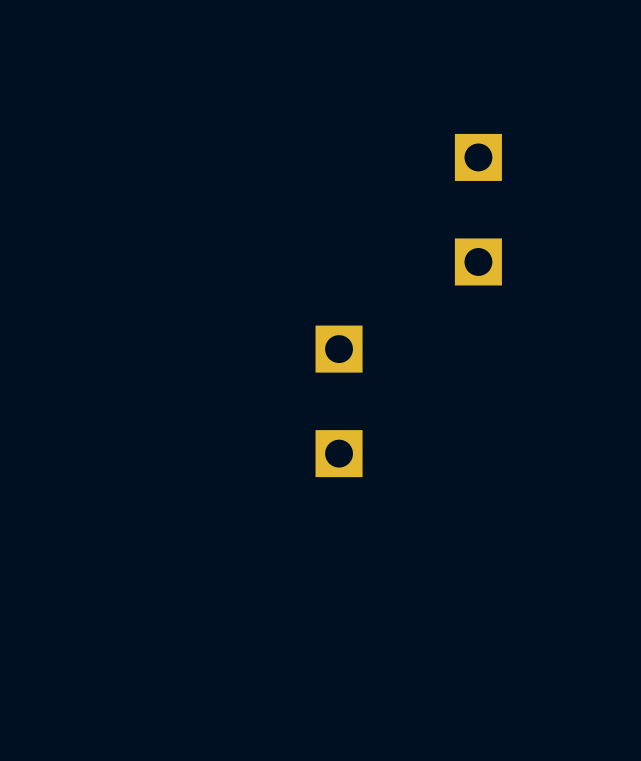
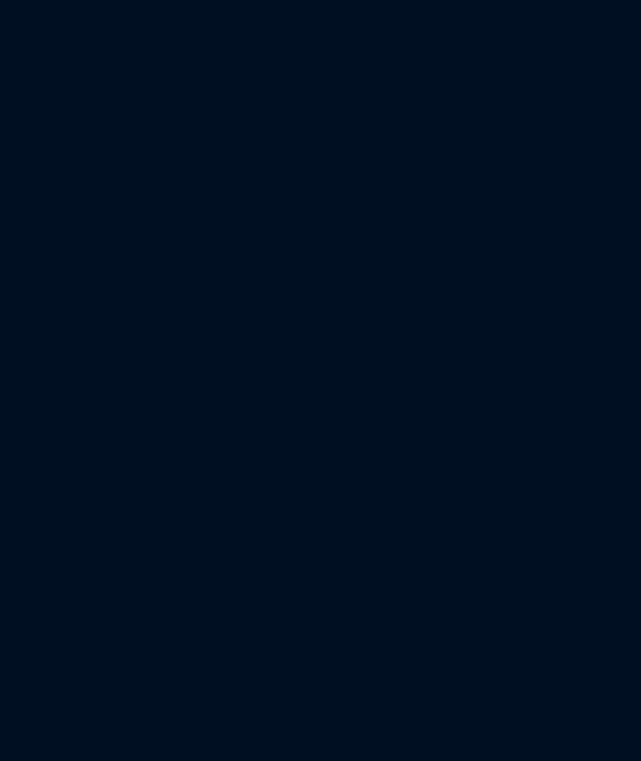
part: (478, 157) -> none
part: (478, 261) -> none
part: (339, 349) -> none
part: (339, 453) -> none

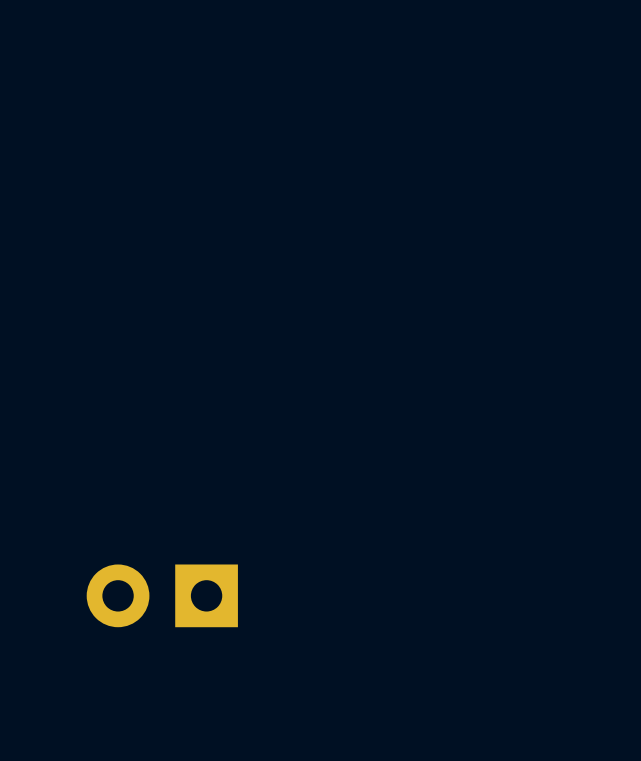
part: none -> (162, 595)

